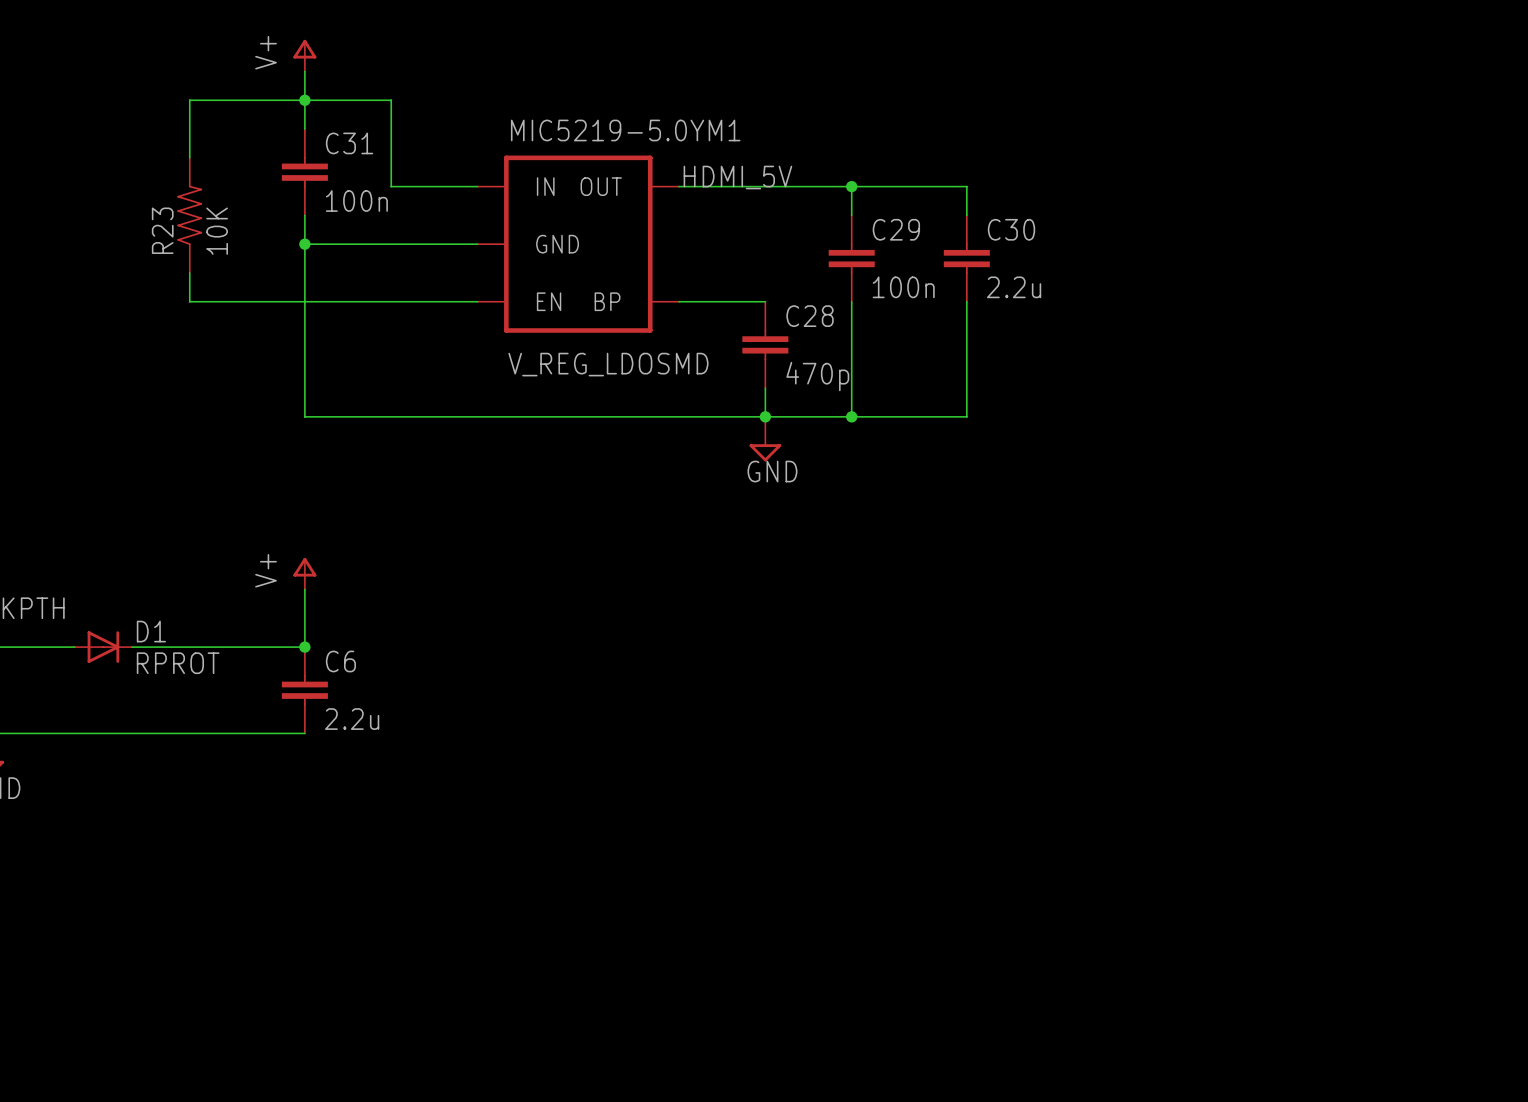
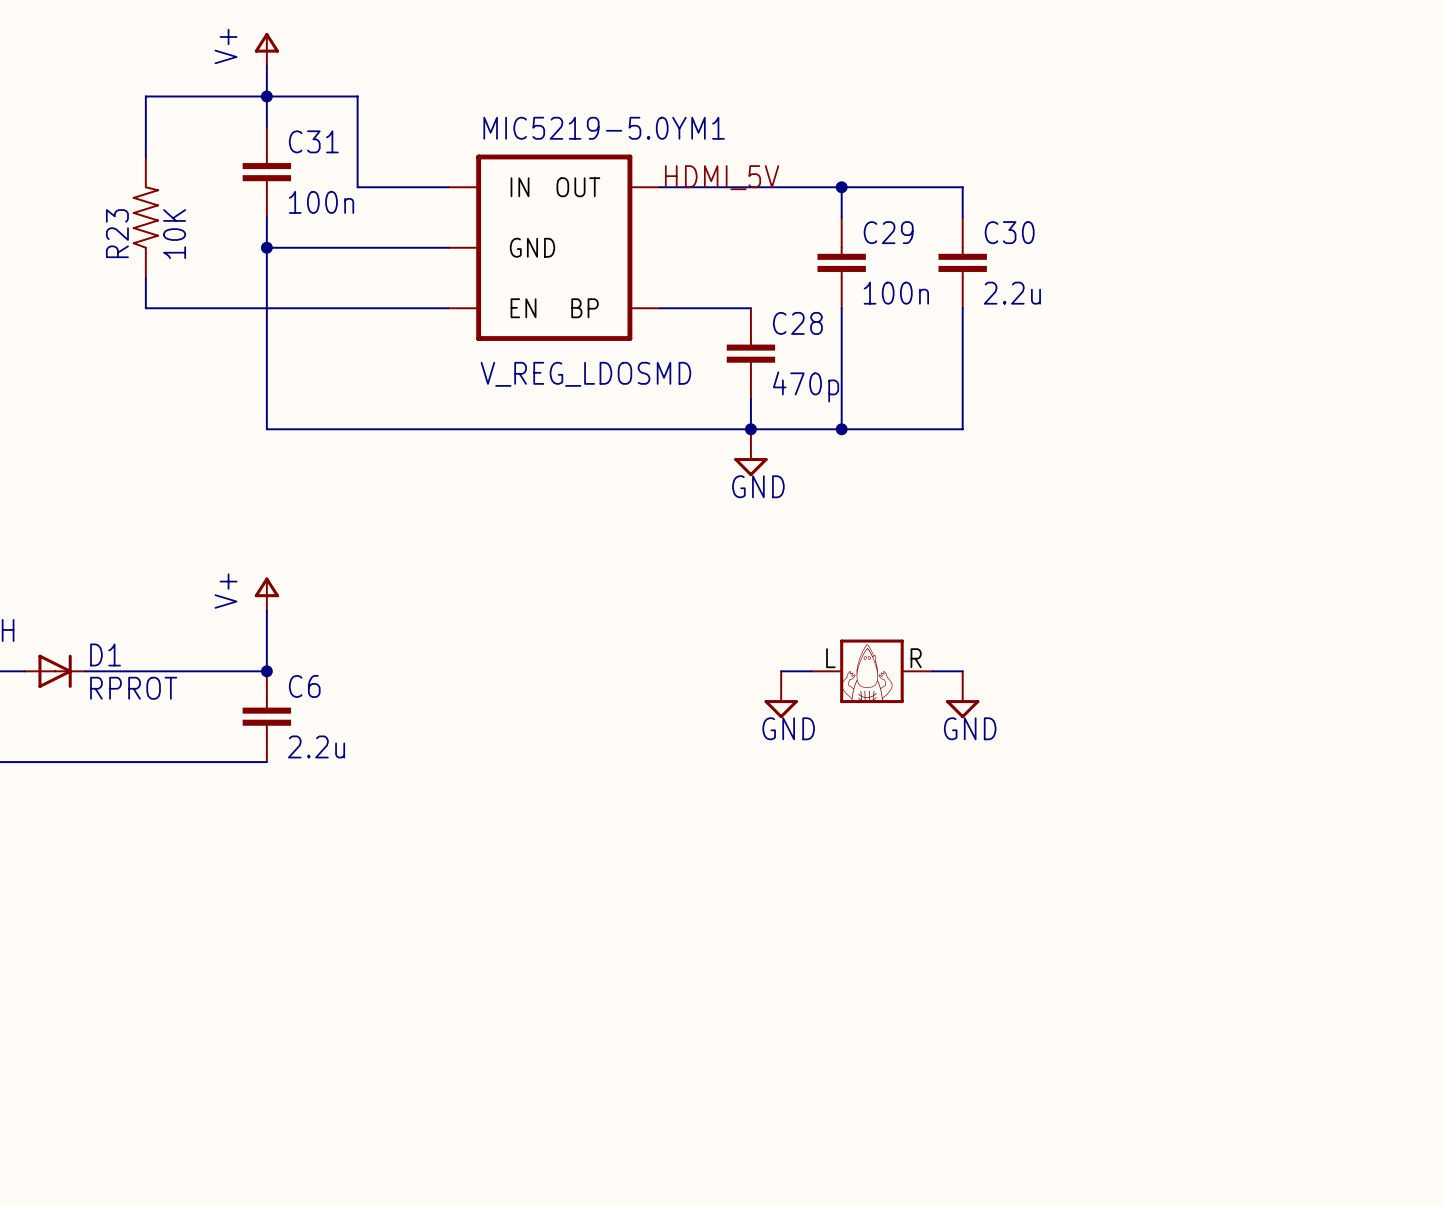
wire: none -> (781, 671) (811, 671)
part: none -> (871, 671)
wire: none -> (932, 671) (962, 671)
power symbol: none -> GND (781, 694)
power symbol: none -> GND (962, 694)

